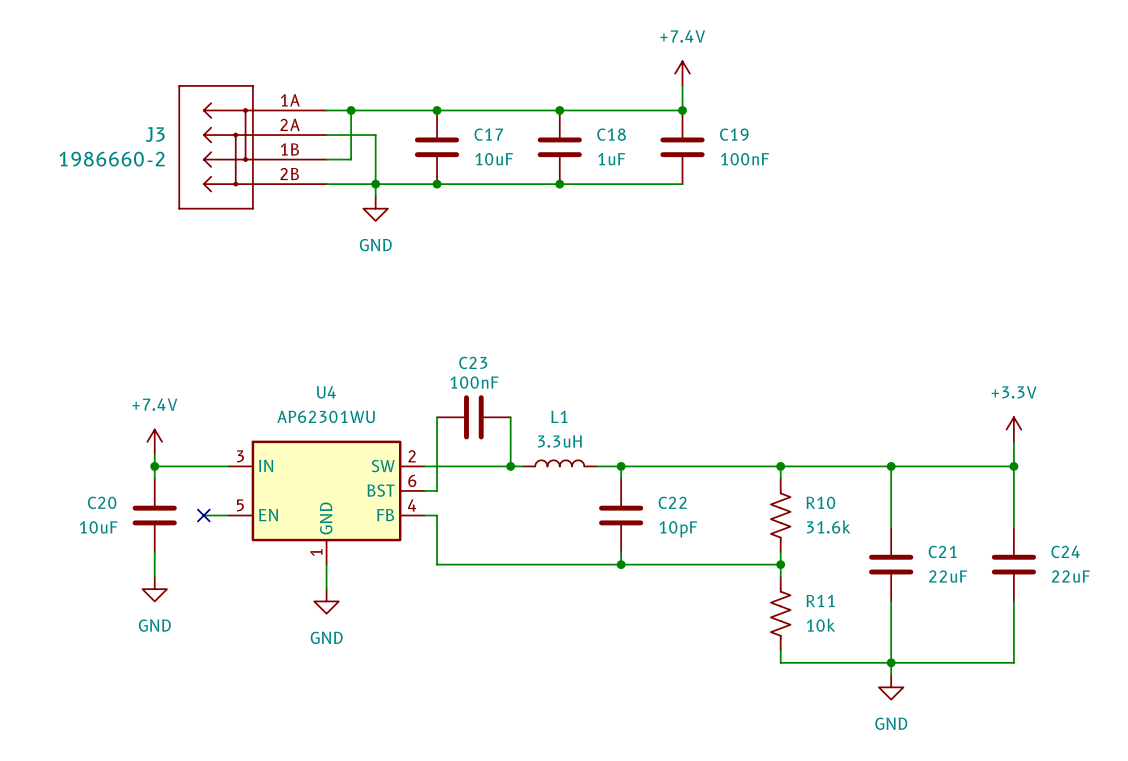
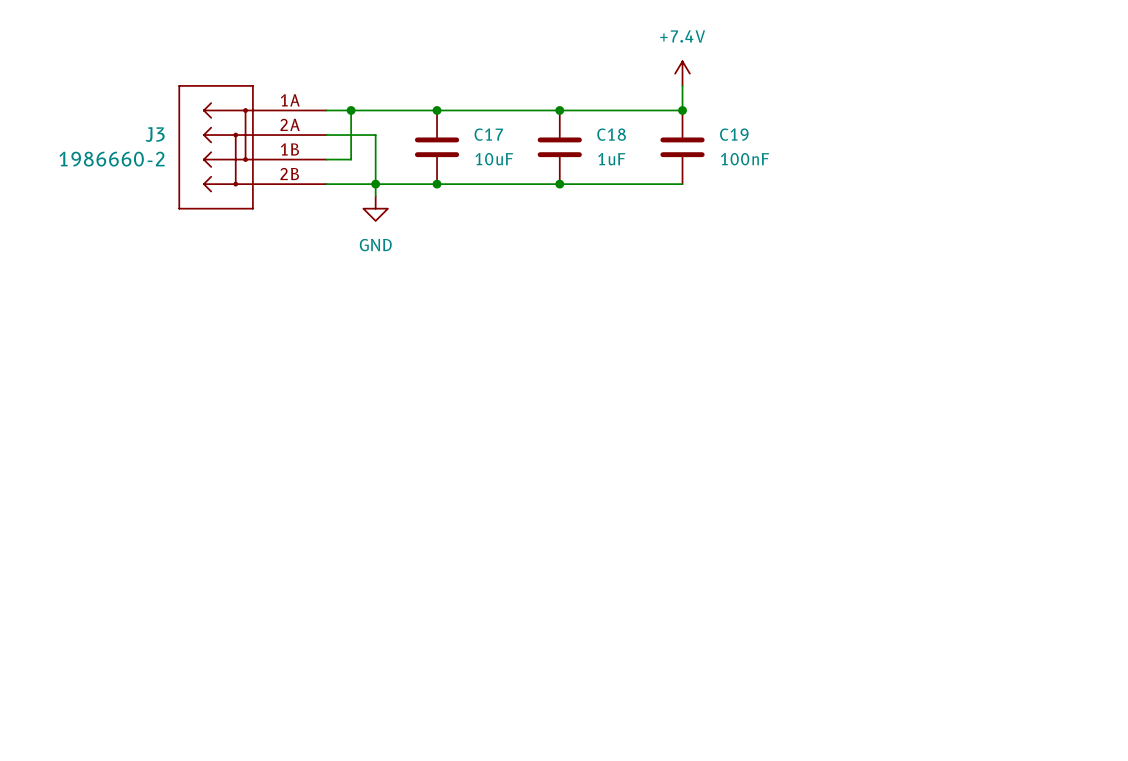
wire: (437, 417) (437, 490) (424, 490) -> none
C23: 100nF (473, 417) -> none
wire: (510, 417) (510, 466) -> none
power symbol: +3.3V (1013, 429) -> none
power symbol: +7.4V (154, 441) -> none
wire: (1013, 441) (1013, 527) -> none
wire: (154, 454) (154, 478) -> none
L1: 3.3uH (559, 463) -> none
wire: (154, 466) (228, 466) -> none
junction: (154, 466) -> none
wire: (424, 466) (522, 466) -> none
junction: (510, 466) -> none
wire: (596, 466) (1013, 466) -> none
wire: (621, 466) (621, 478) -> none
junction: (621, 466) -> none
wire: (780, 466) (780, 478) -> none
junction: (780, 466) -> none
wire: (891, 466) (891, 527) -> none
junction: (891, 466) -> none
junction: (1013, 466) -> none
U4: AP62301WU (326, 502) -> none
C20: 10uF (154, 515) -> none
wire: (203, 515) (228, 515) -> none
no-connect mark: (203, 515) -> none
wire: (424, 515) (437, 515) (437, 564) (780, 564) -> none
C22: 10pF (621, 515) -> none
R10: 31.6k (780, 515) -> none
wire: (154, 552) (154, 576) -> none
wire: (621, 552) (621, 564) -> none
wire: (780, 552) (780, 576) -> none
wire: (326, 564) (326, 589) -> none
junction: (621, 564) -> none
junction: (780, 564) -> none
C21: 22uF (891, 564) -> none
C24: 22uF (1013, 564) -> none
power symbol: GND (154, 589) -> none
power symbol: GND (326, 601) -> none
wire: (891, 601) (891, 675) -> none
wire: (1013, 601) (1013, 662) (780, 662) (780, 650) -> none
R11: 10k (780, 613) -> none
junction: (891, 662) -> none
power symbol: GND (891, 687) -> none

